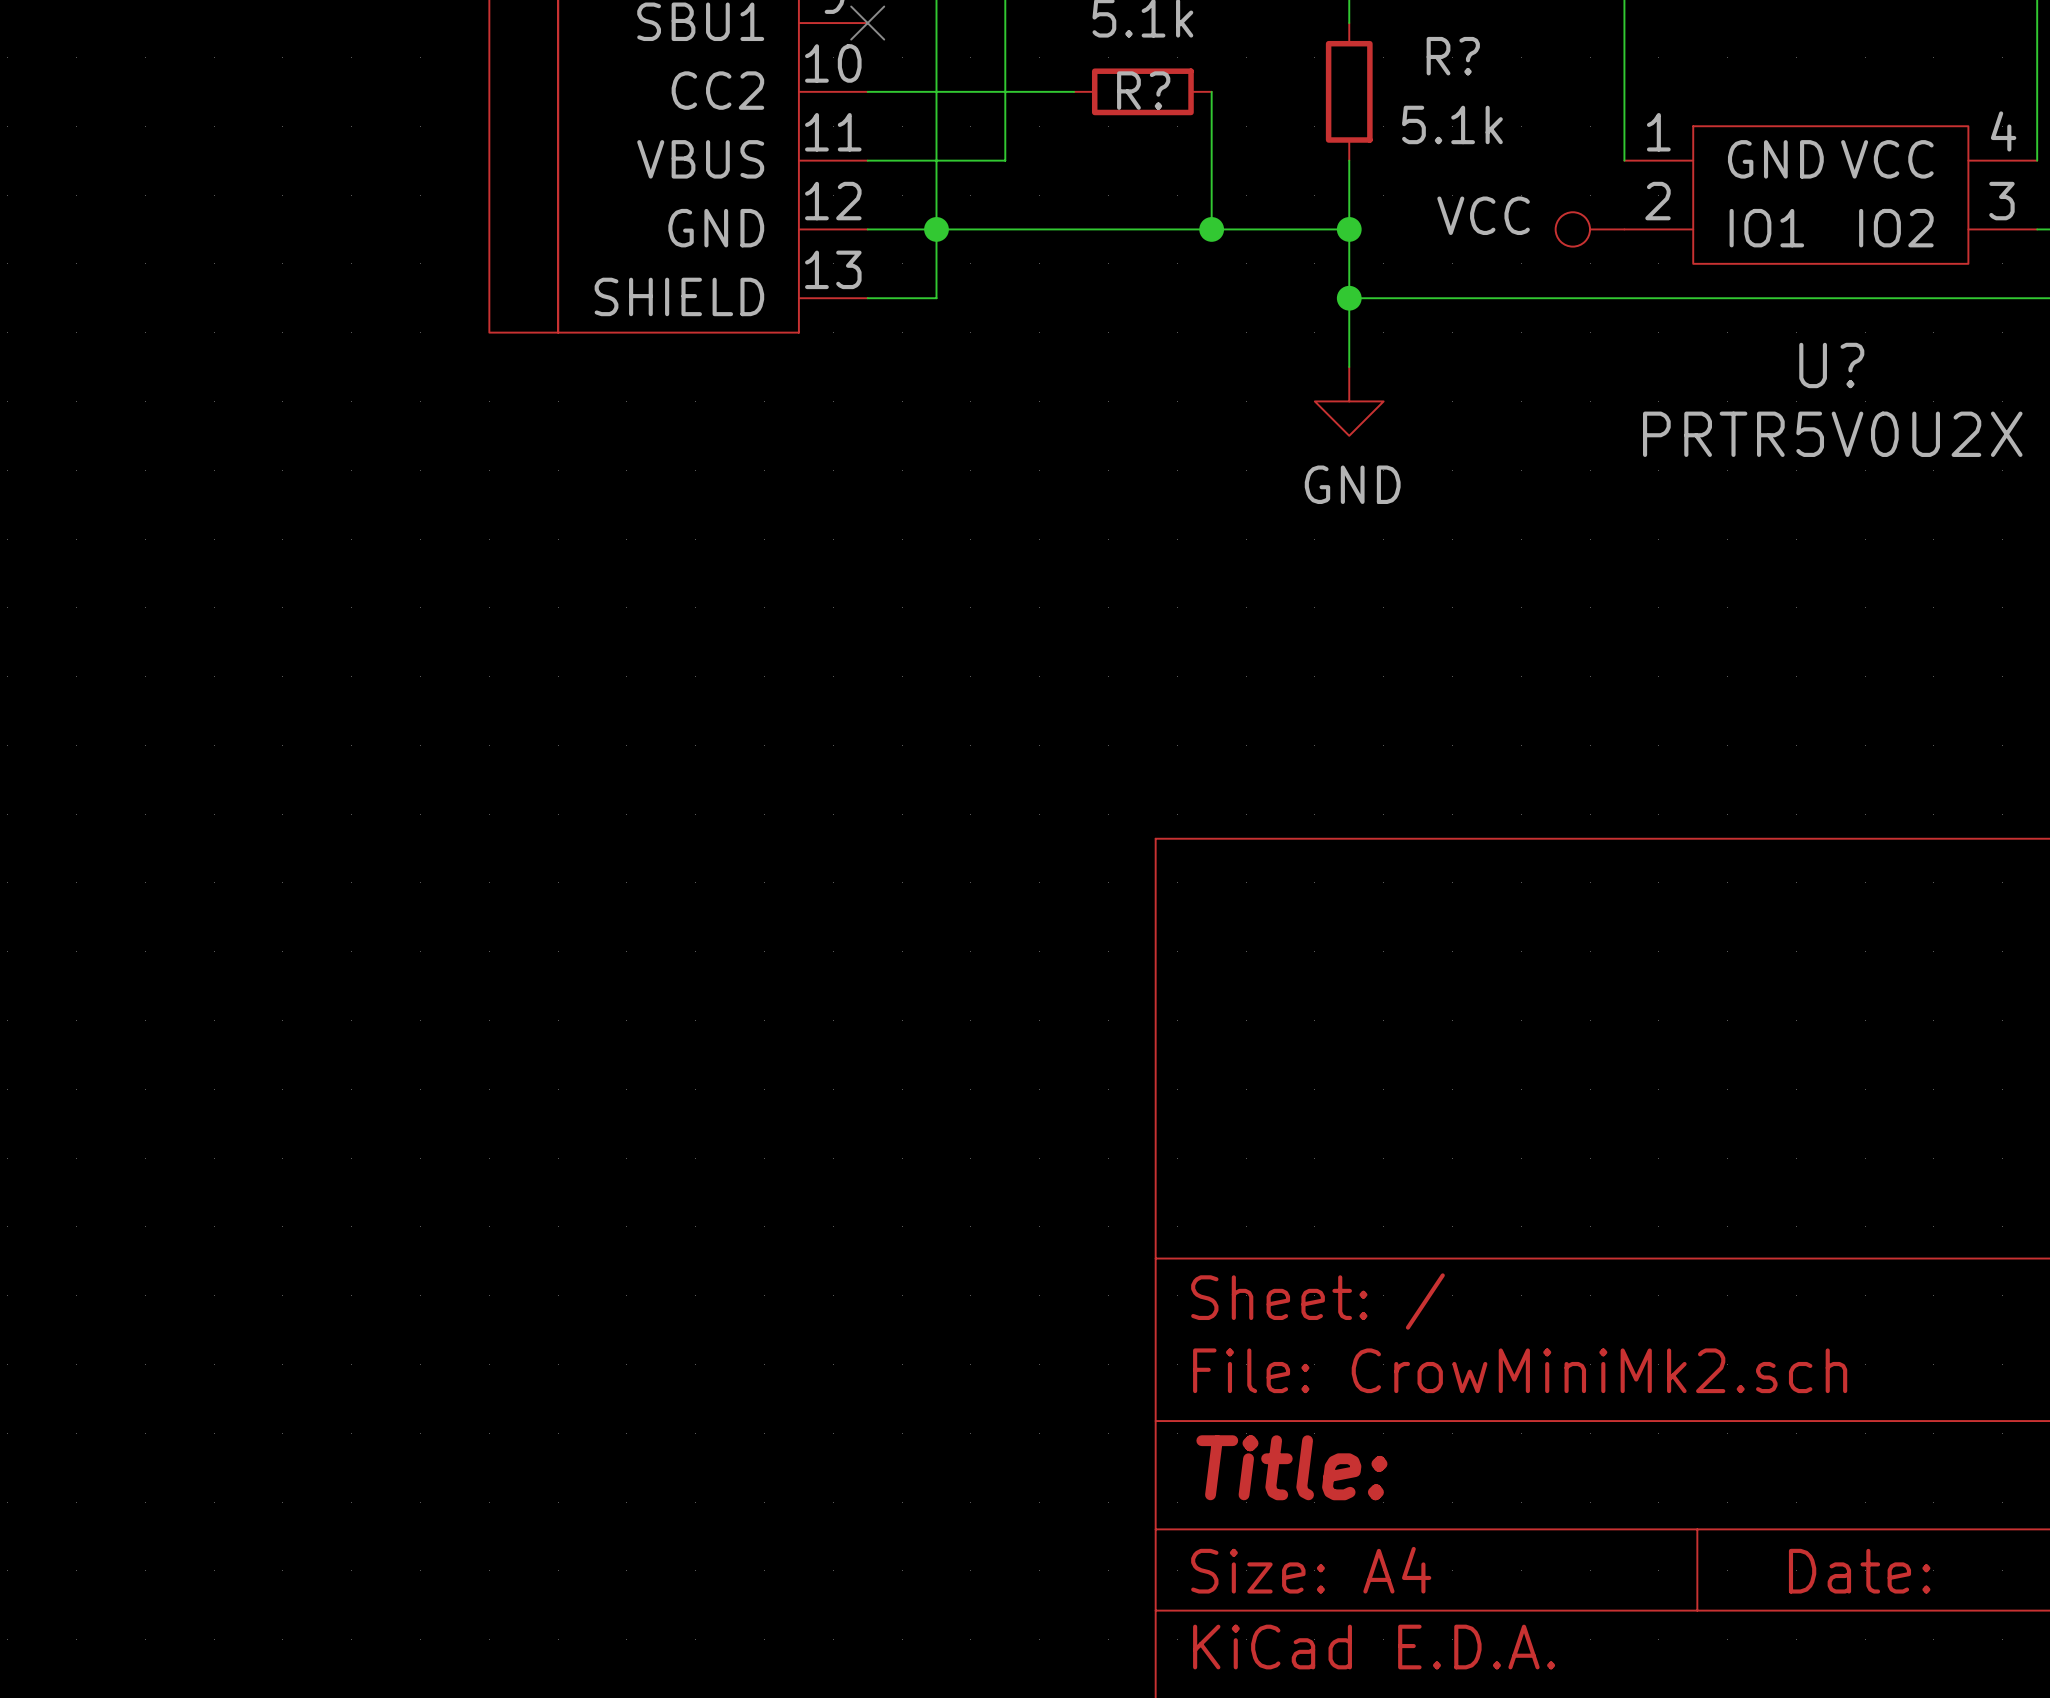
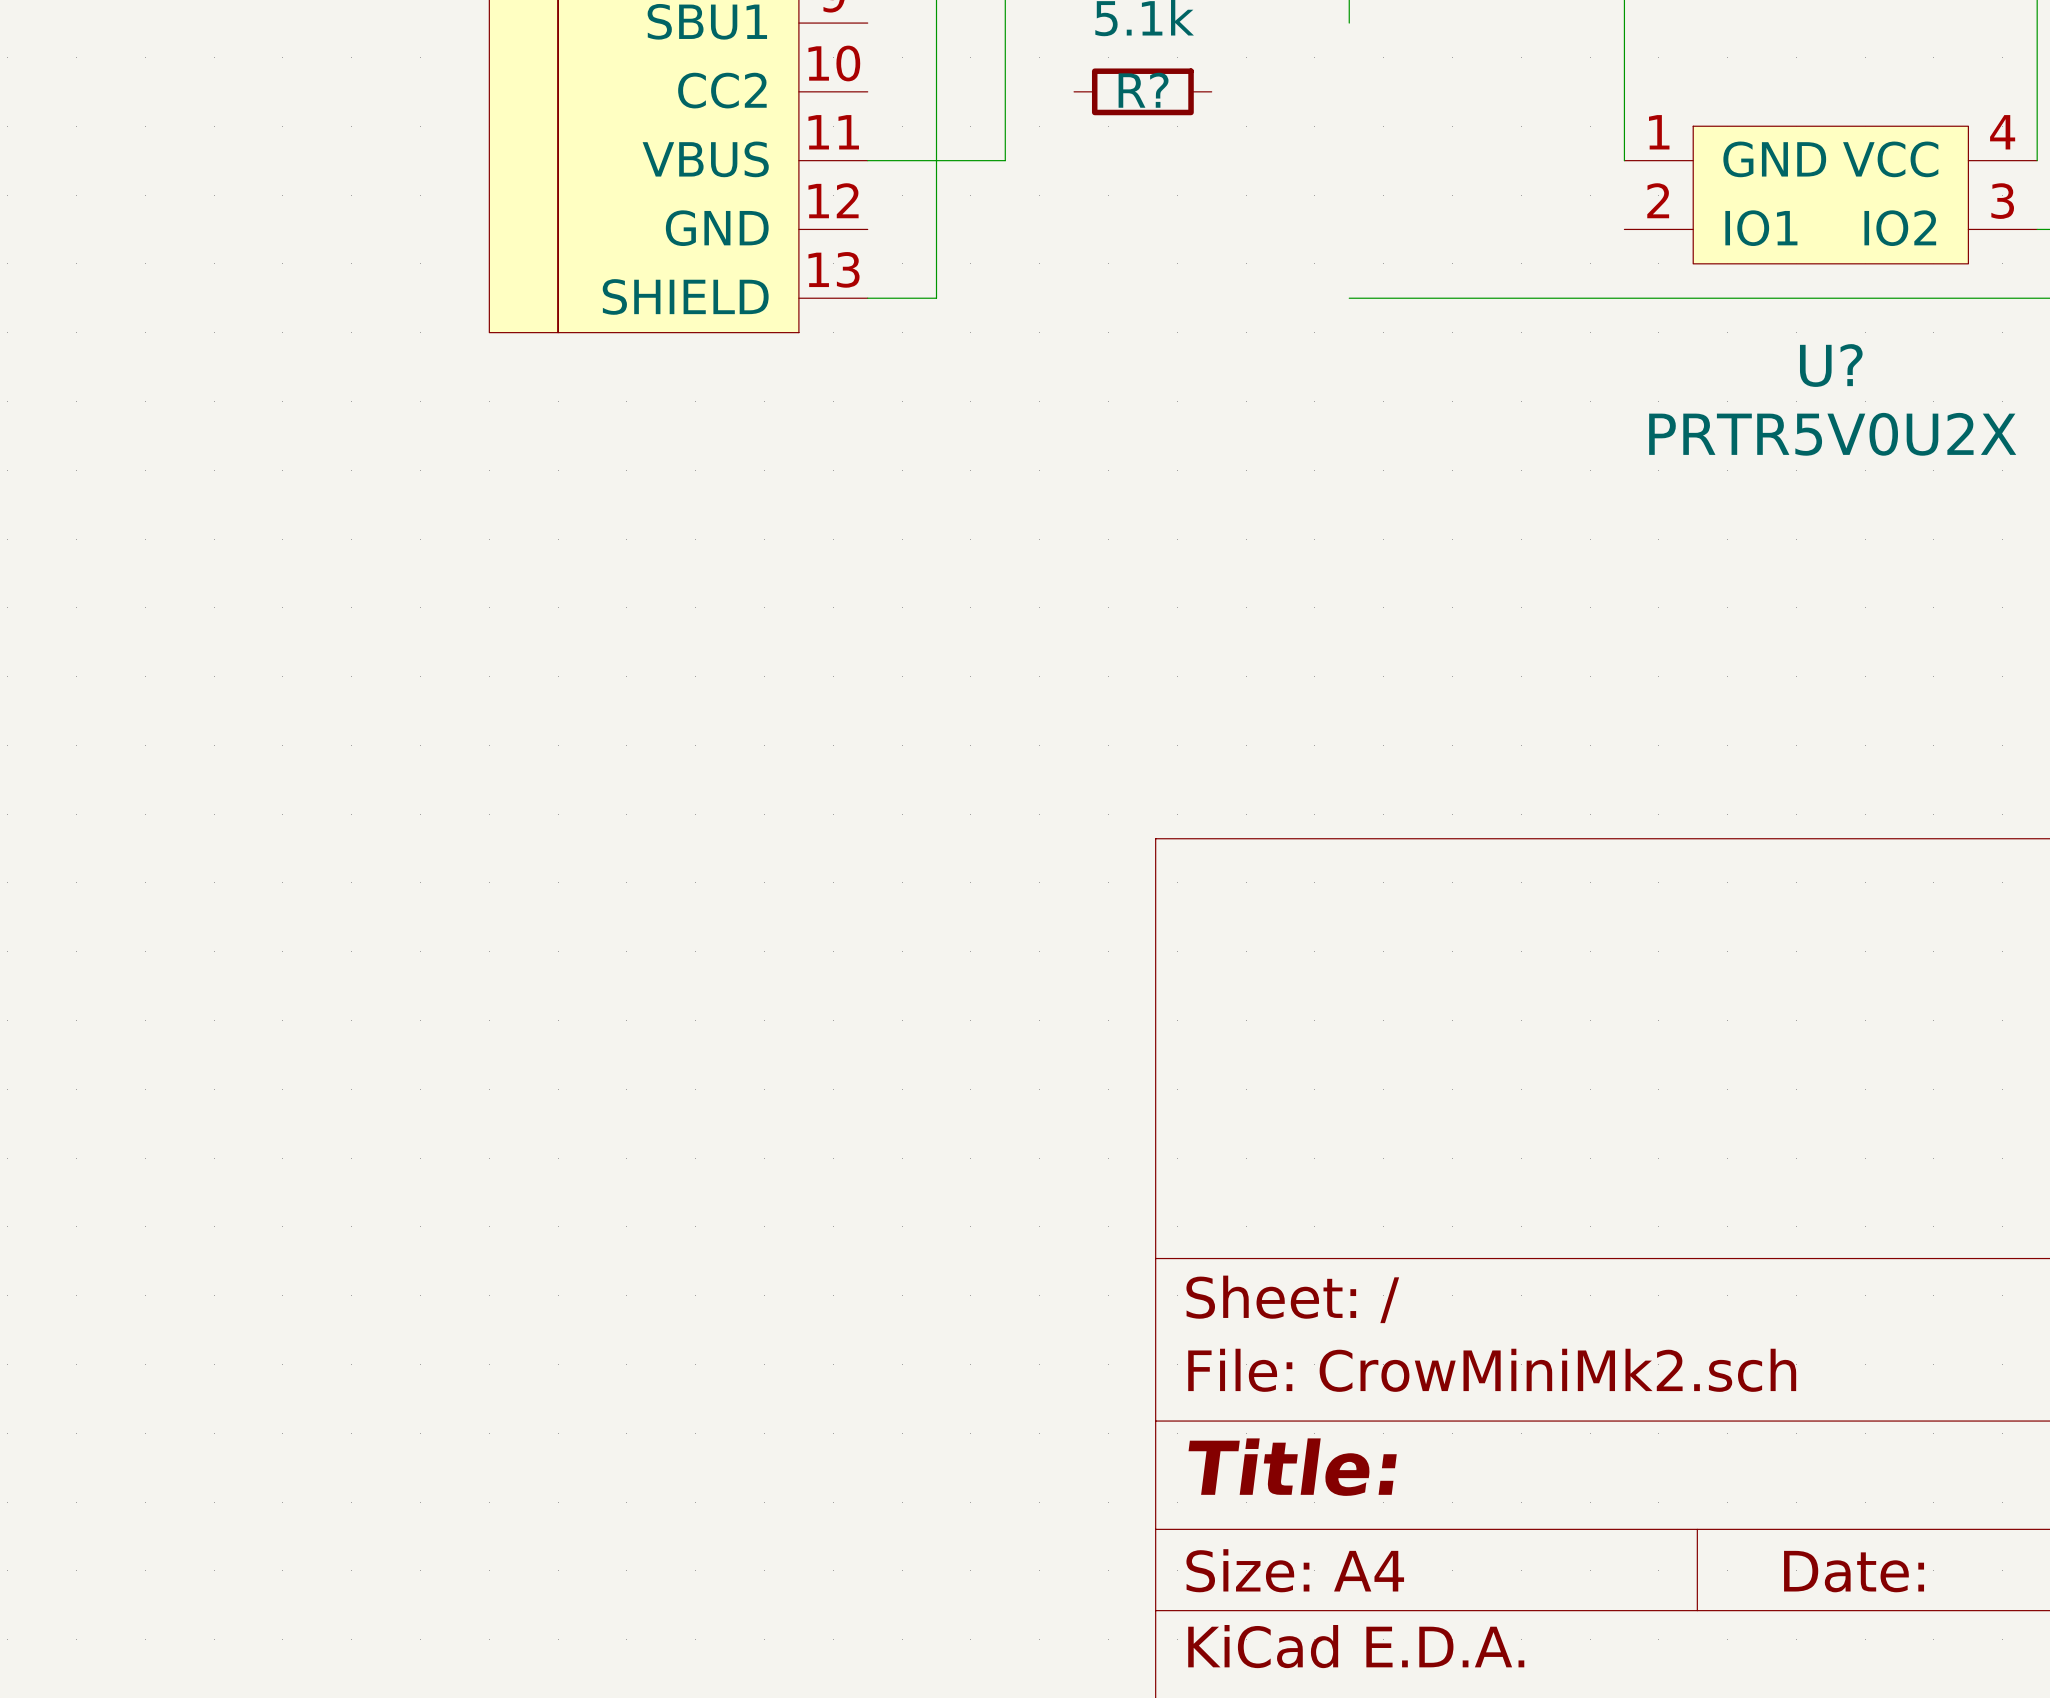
no-connect mark: (867, 23) -> none
wire: (867, 91) (1074, 91) -> none
wire: (1211, 91) (1211, 229) -> none
R?: 5.1k (1349, 91) -> none
wire: (1349, 160) (1349, 367) -> none
wire: (867, 229) (1349, 229) -> none
junction: (936, 229) -> none
junction: (1211, 229) -> none
junction: (1349, 229) -> none
power symbol: VCC (1590, 229) -> none
junction: (1349, 298) -> none
power symbol: GND (1349, 401) -> none

